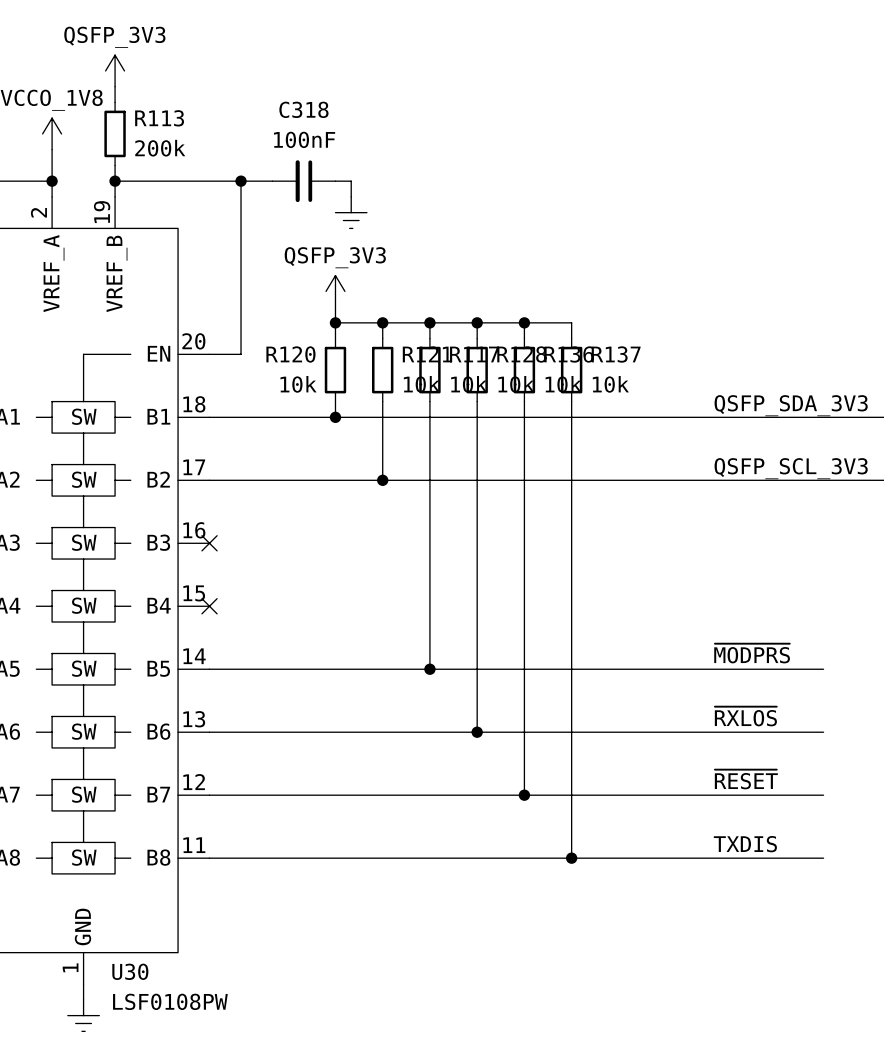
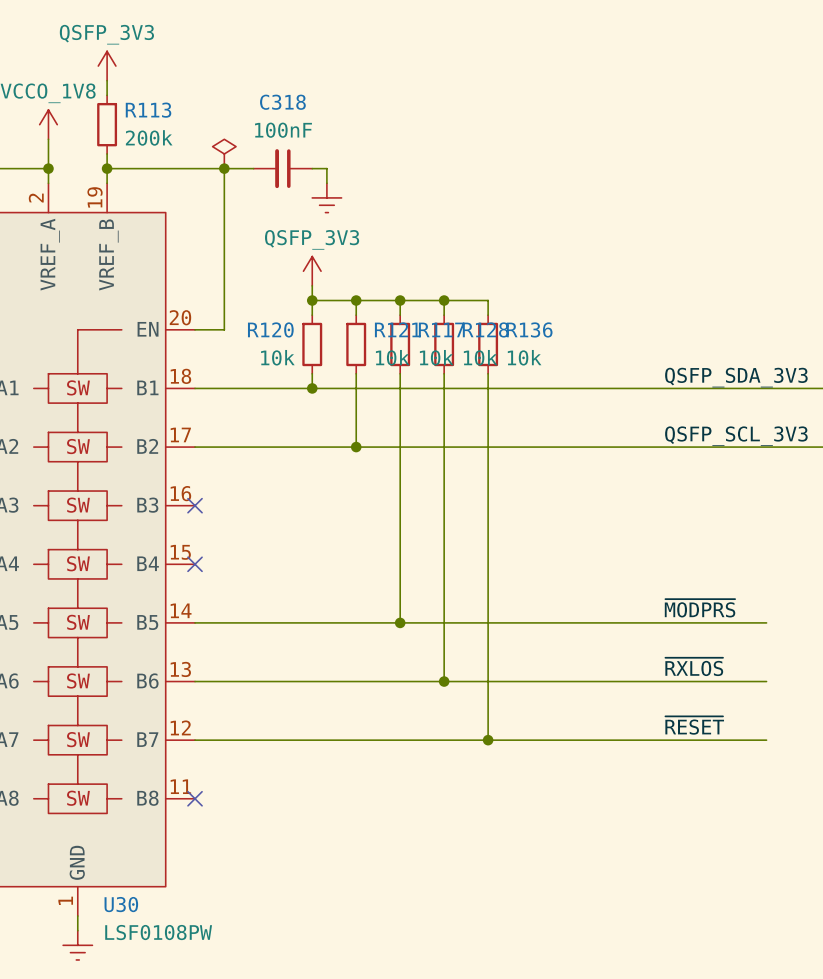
power symbol: none -> (224, 153)
wire: (524, 322) (571, 322) (571, 338) -> none
junction: (524, 322) -> none
R137: 10k (571, 370) -> none
wire: (571, 401) (571, 858) -> none
label: TXDIS (745, 844) -> none
wire: (209, 858) (823, 858) -> none
no-connect mark: none -> (195, 798)
junction: (571, 858) -> none

